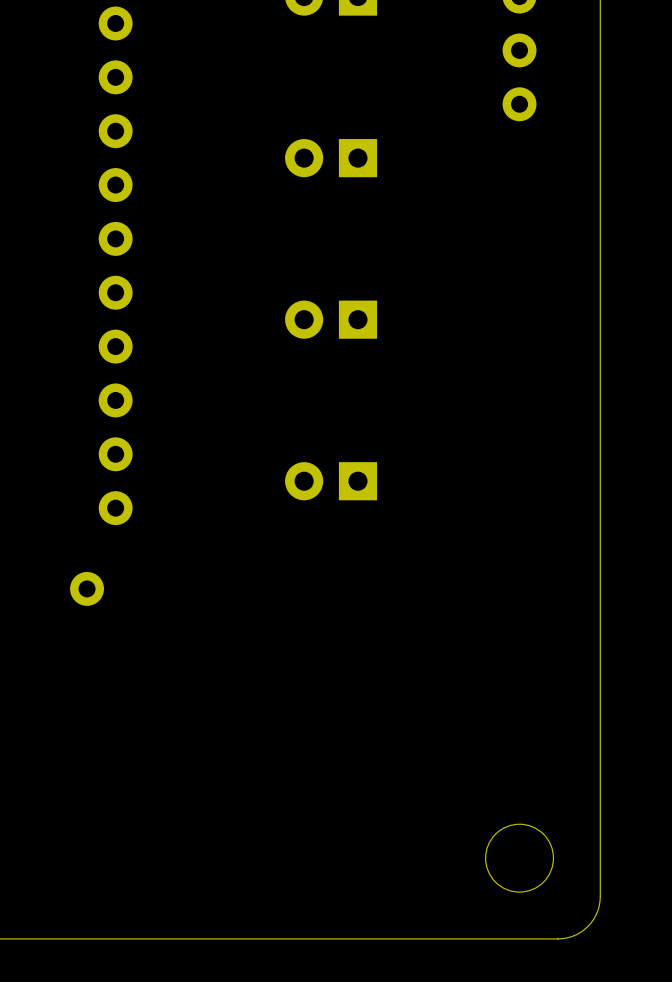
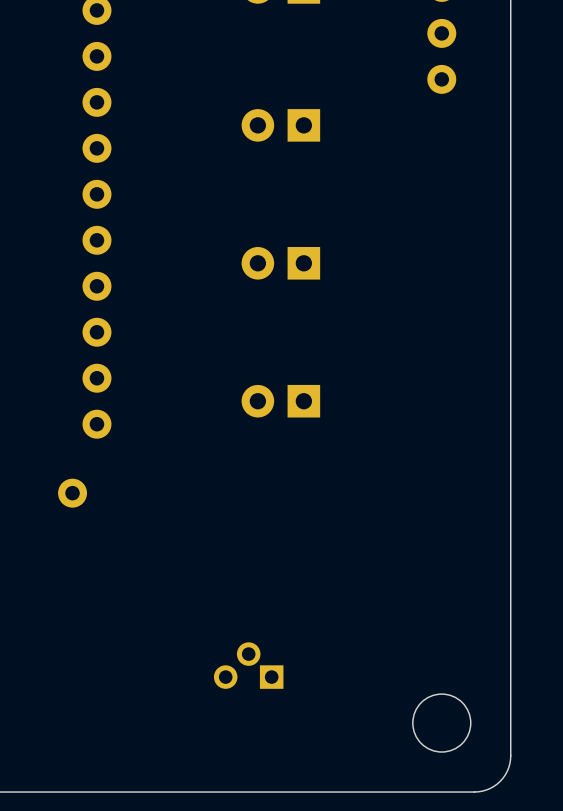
part: none -> (248, 665)

